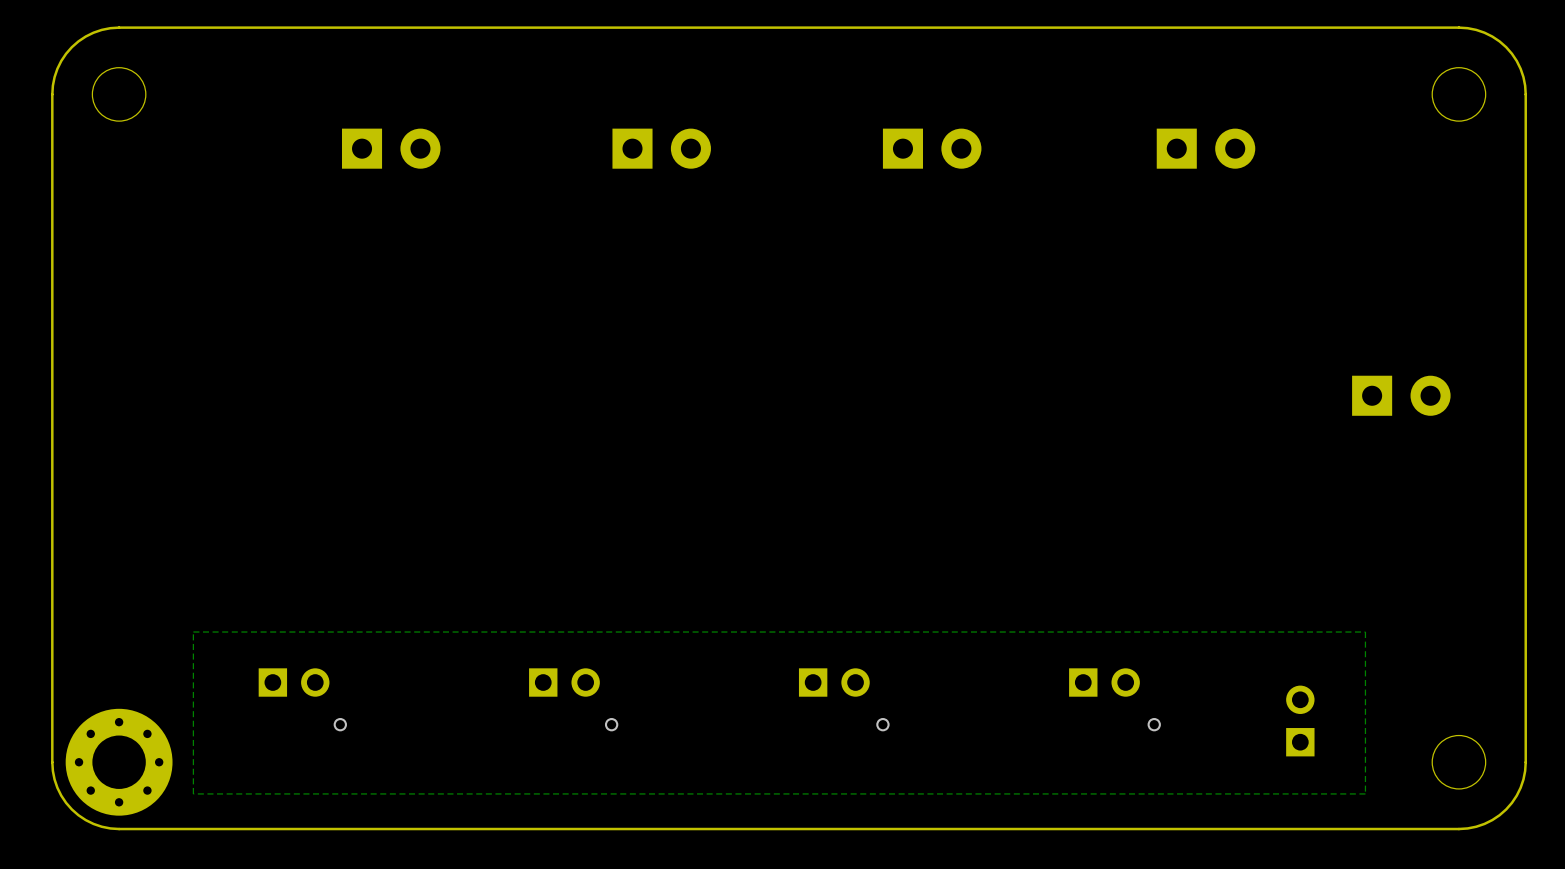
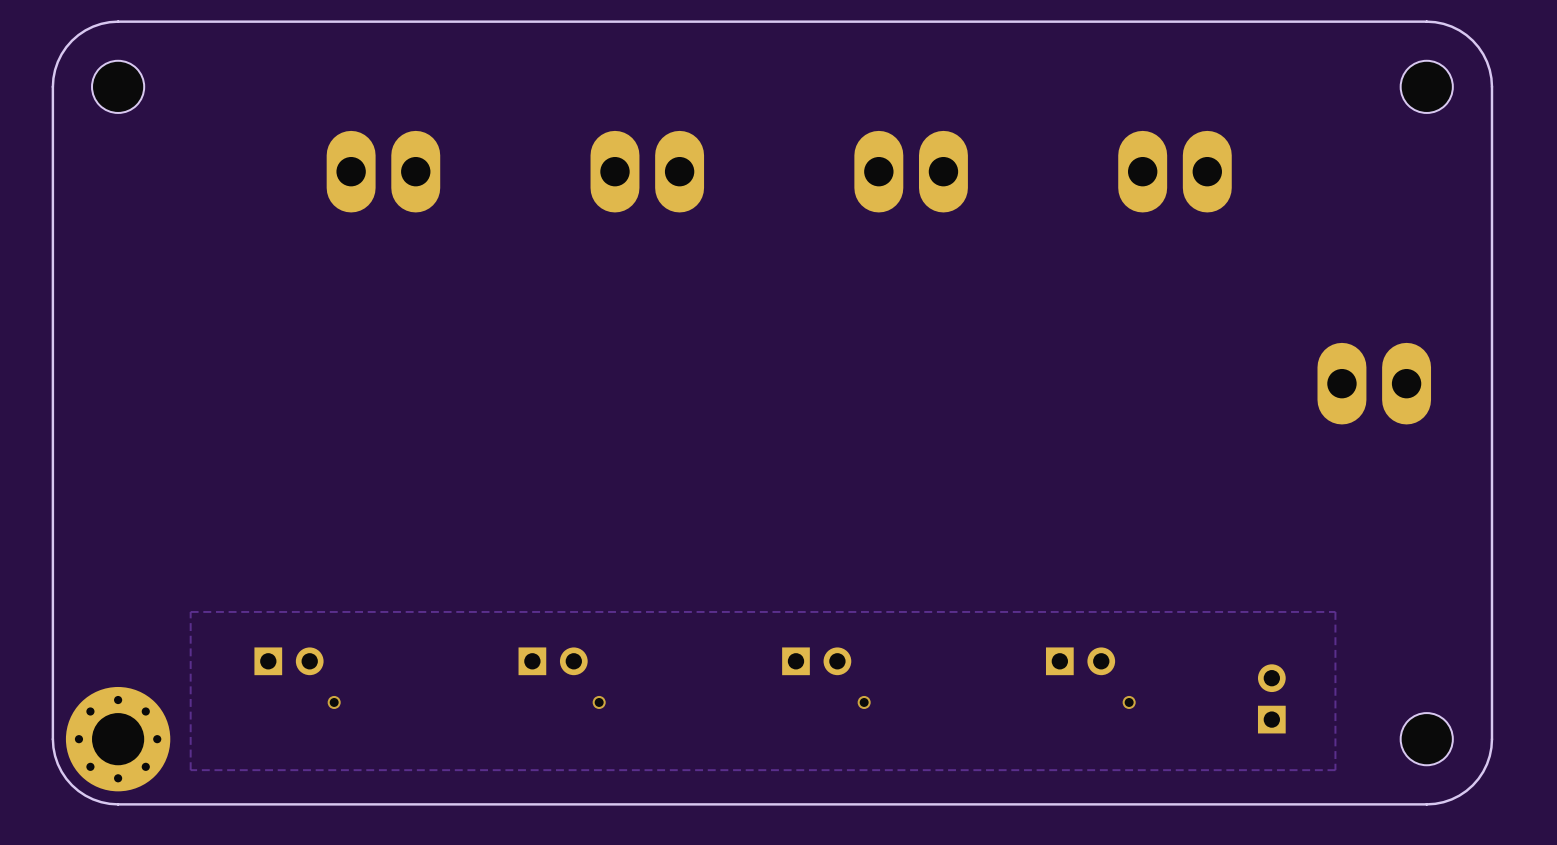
part: (391, 148) -> none
part: (661, 148) -> none
part: (932, 148) -> none
part: (1206, 148) -> none
part: none -> (383, 171)
part: none -> (647, 171)
part: none -> (911, 171)
part: none -> (1174, 171)
part footprint: [1352, 375, 1451, 416] -> [1317, 342, 1432, 425]

